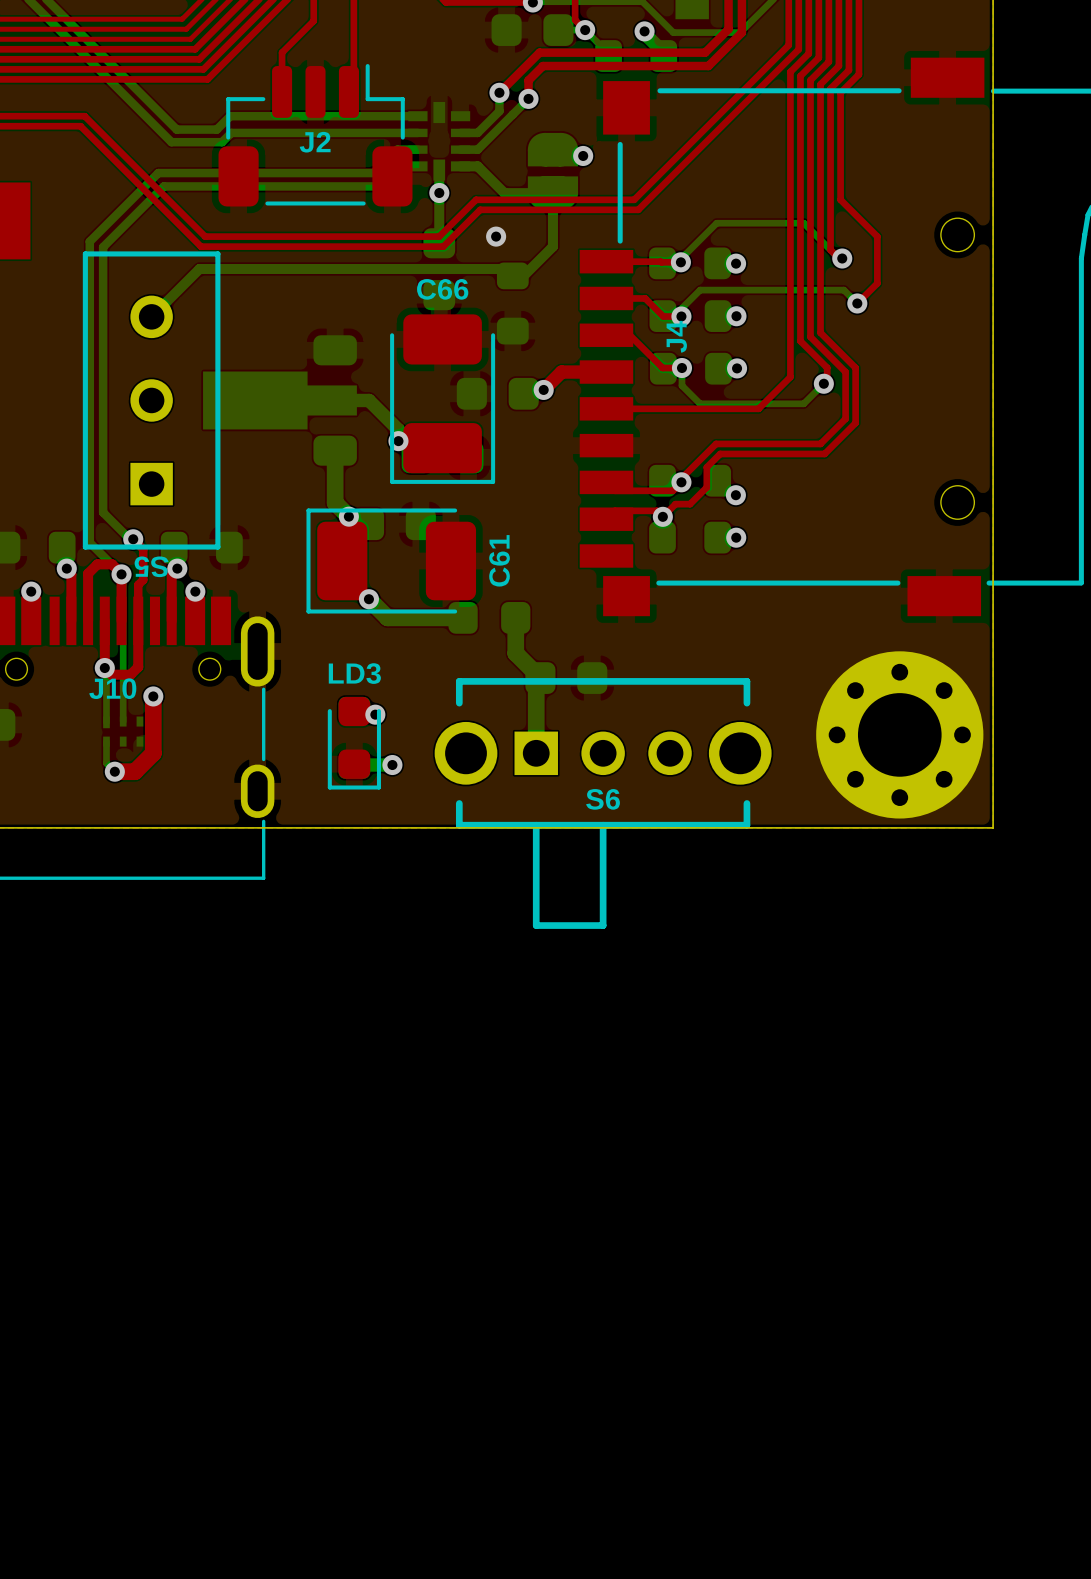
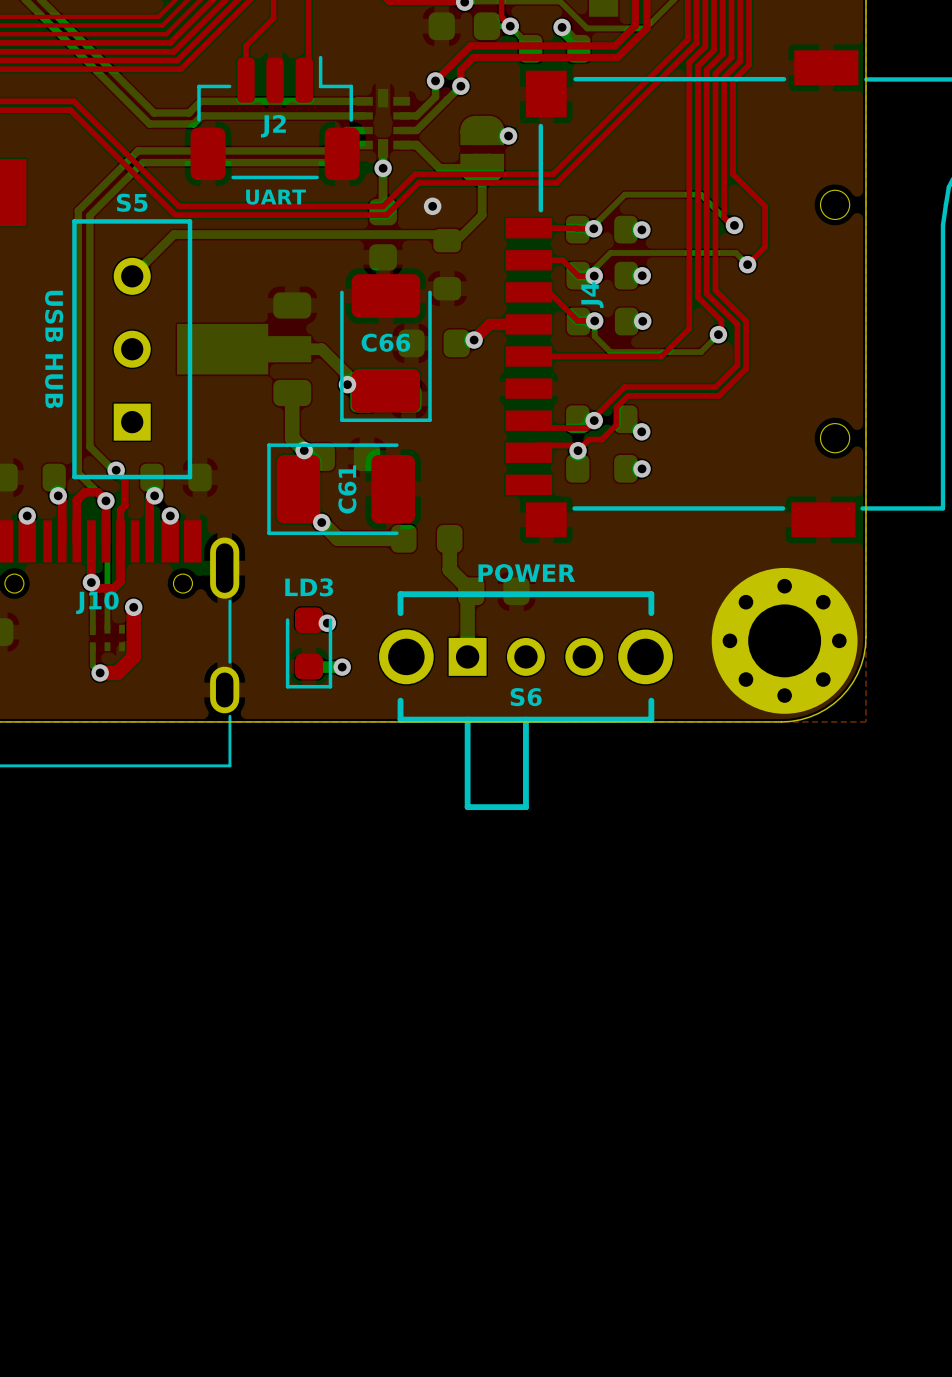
text: none -> UART (276, 197)
C66 name position: C66 (442, 289) -> C66 (385, 342)
text: none -> USB HUB (54, 349)
C61 name position: C61 (499, 560) -> C61 (347, 489)
S5 name rotation: 0° (151, 566) -> 180° (132, 202)
S5 name position: S5 (151, 566) -> S5 (132, 202)
text: none -> POWER (526, 573)
board edge: (993, 730) (993, 827) (896, 827) -> (866, 637) (861, 665) (853, 682) (841, 697) (818, 713) (800, 719) (781, 721)

